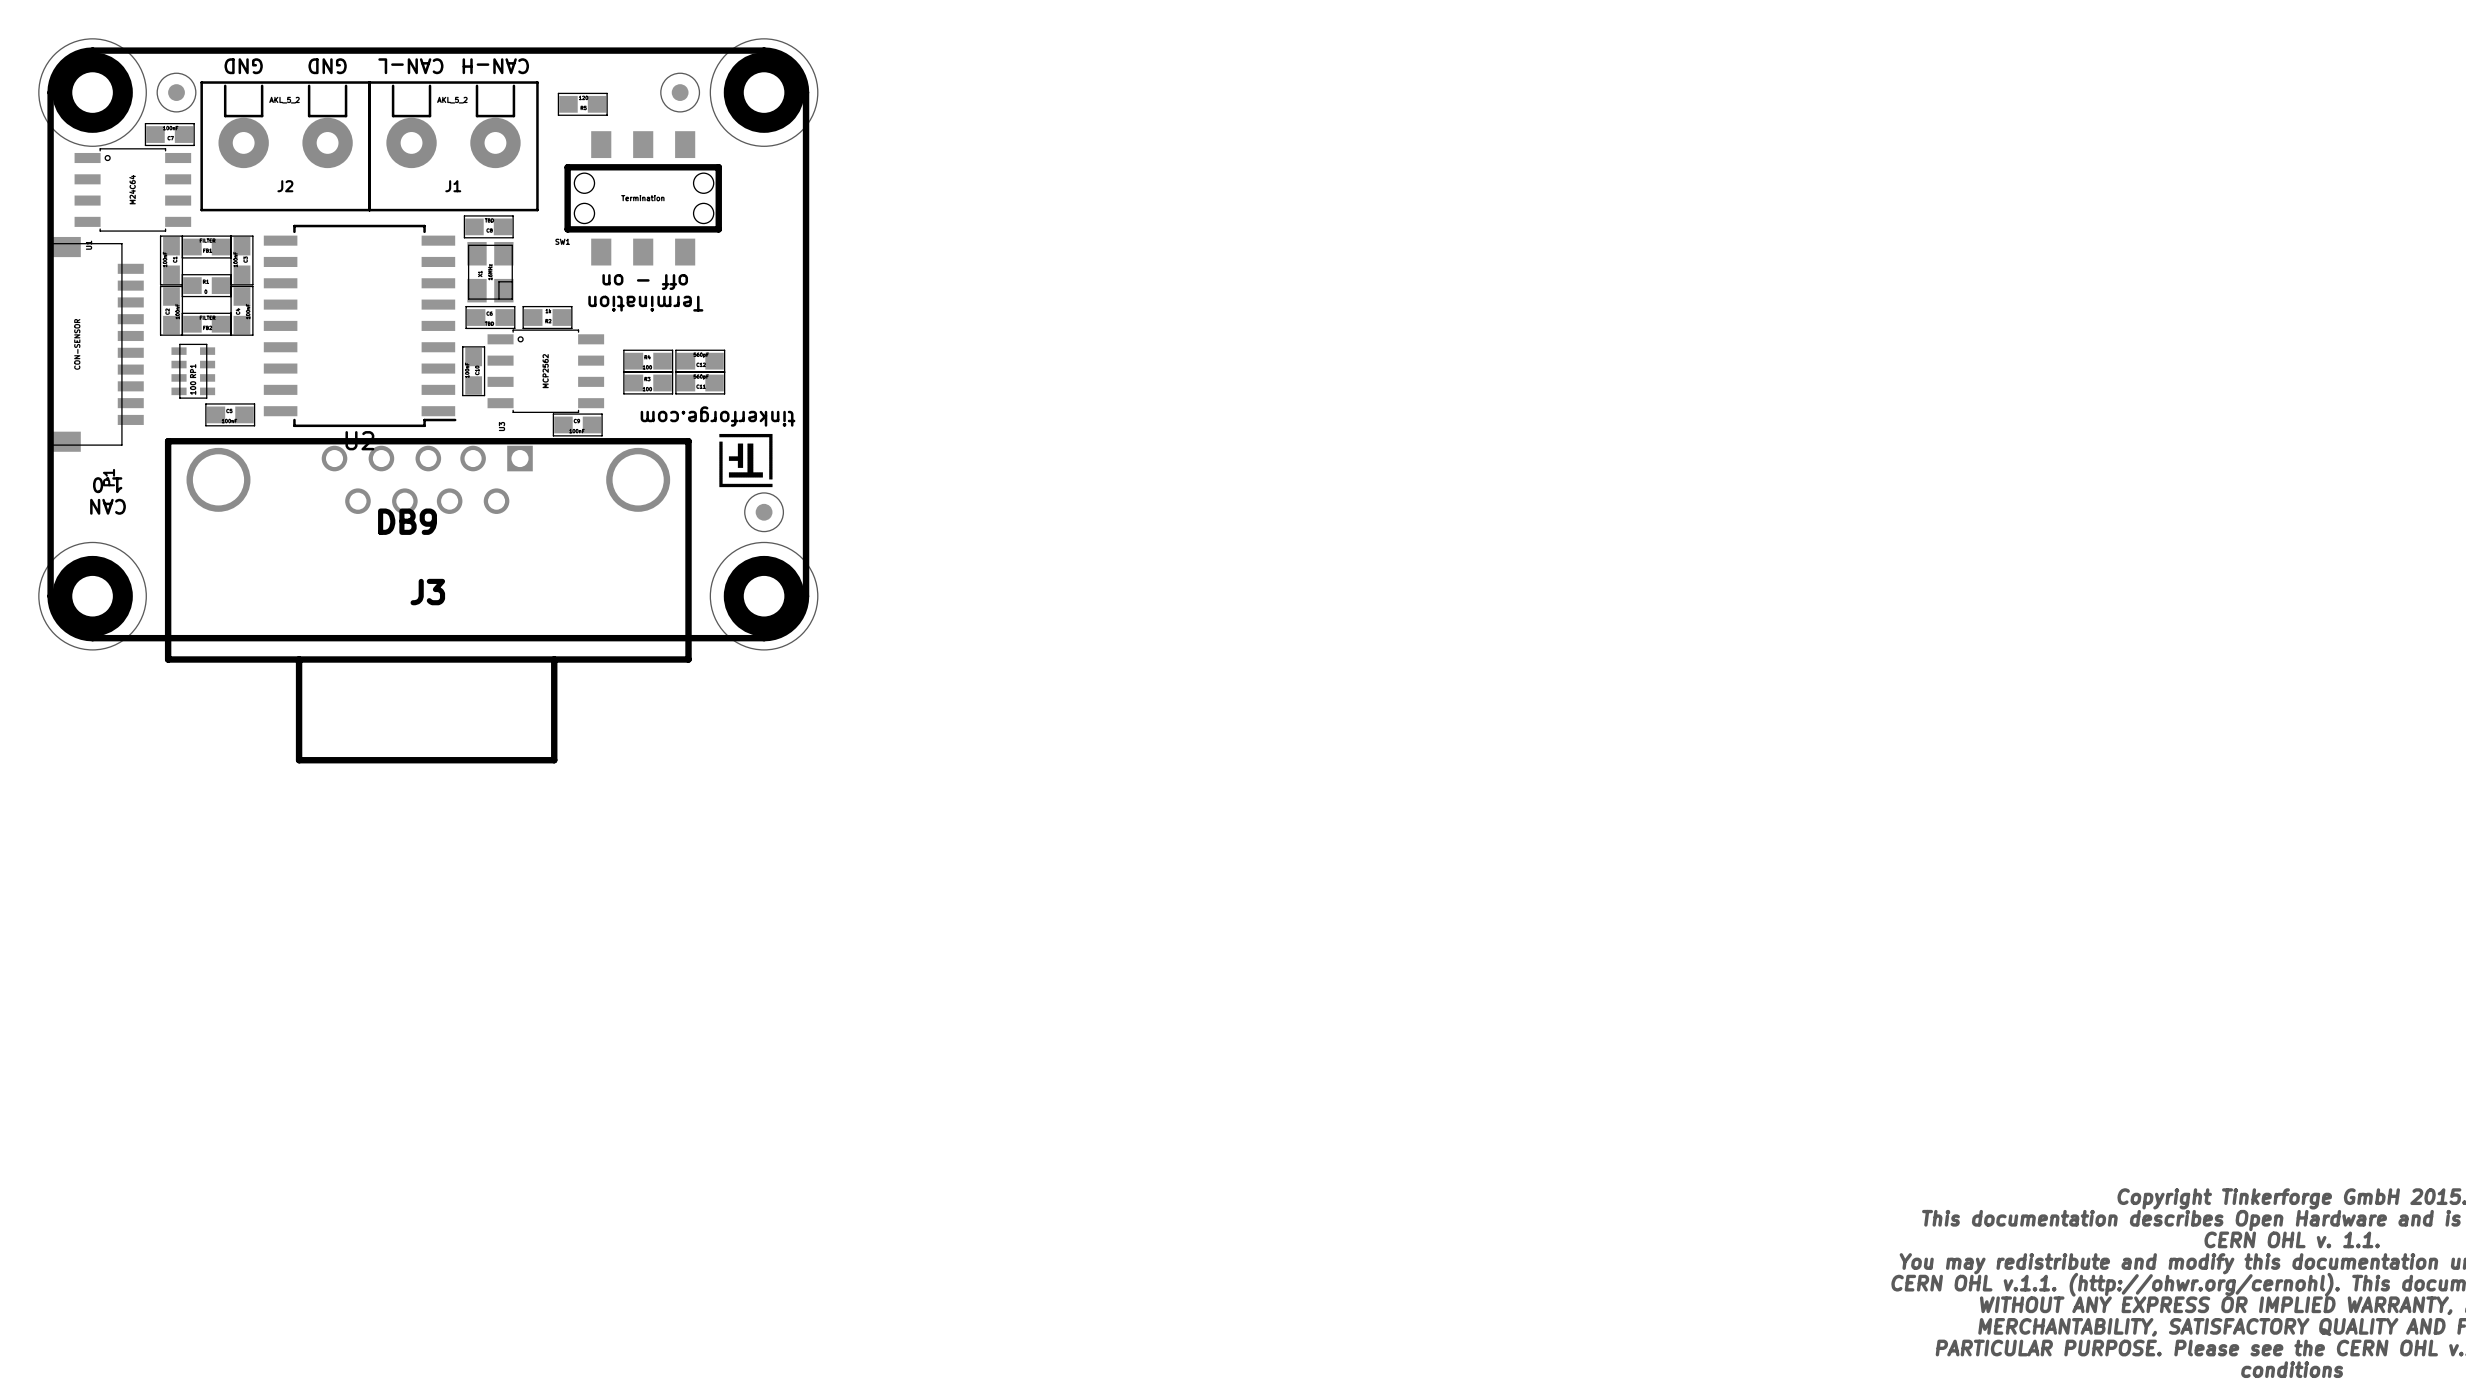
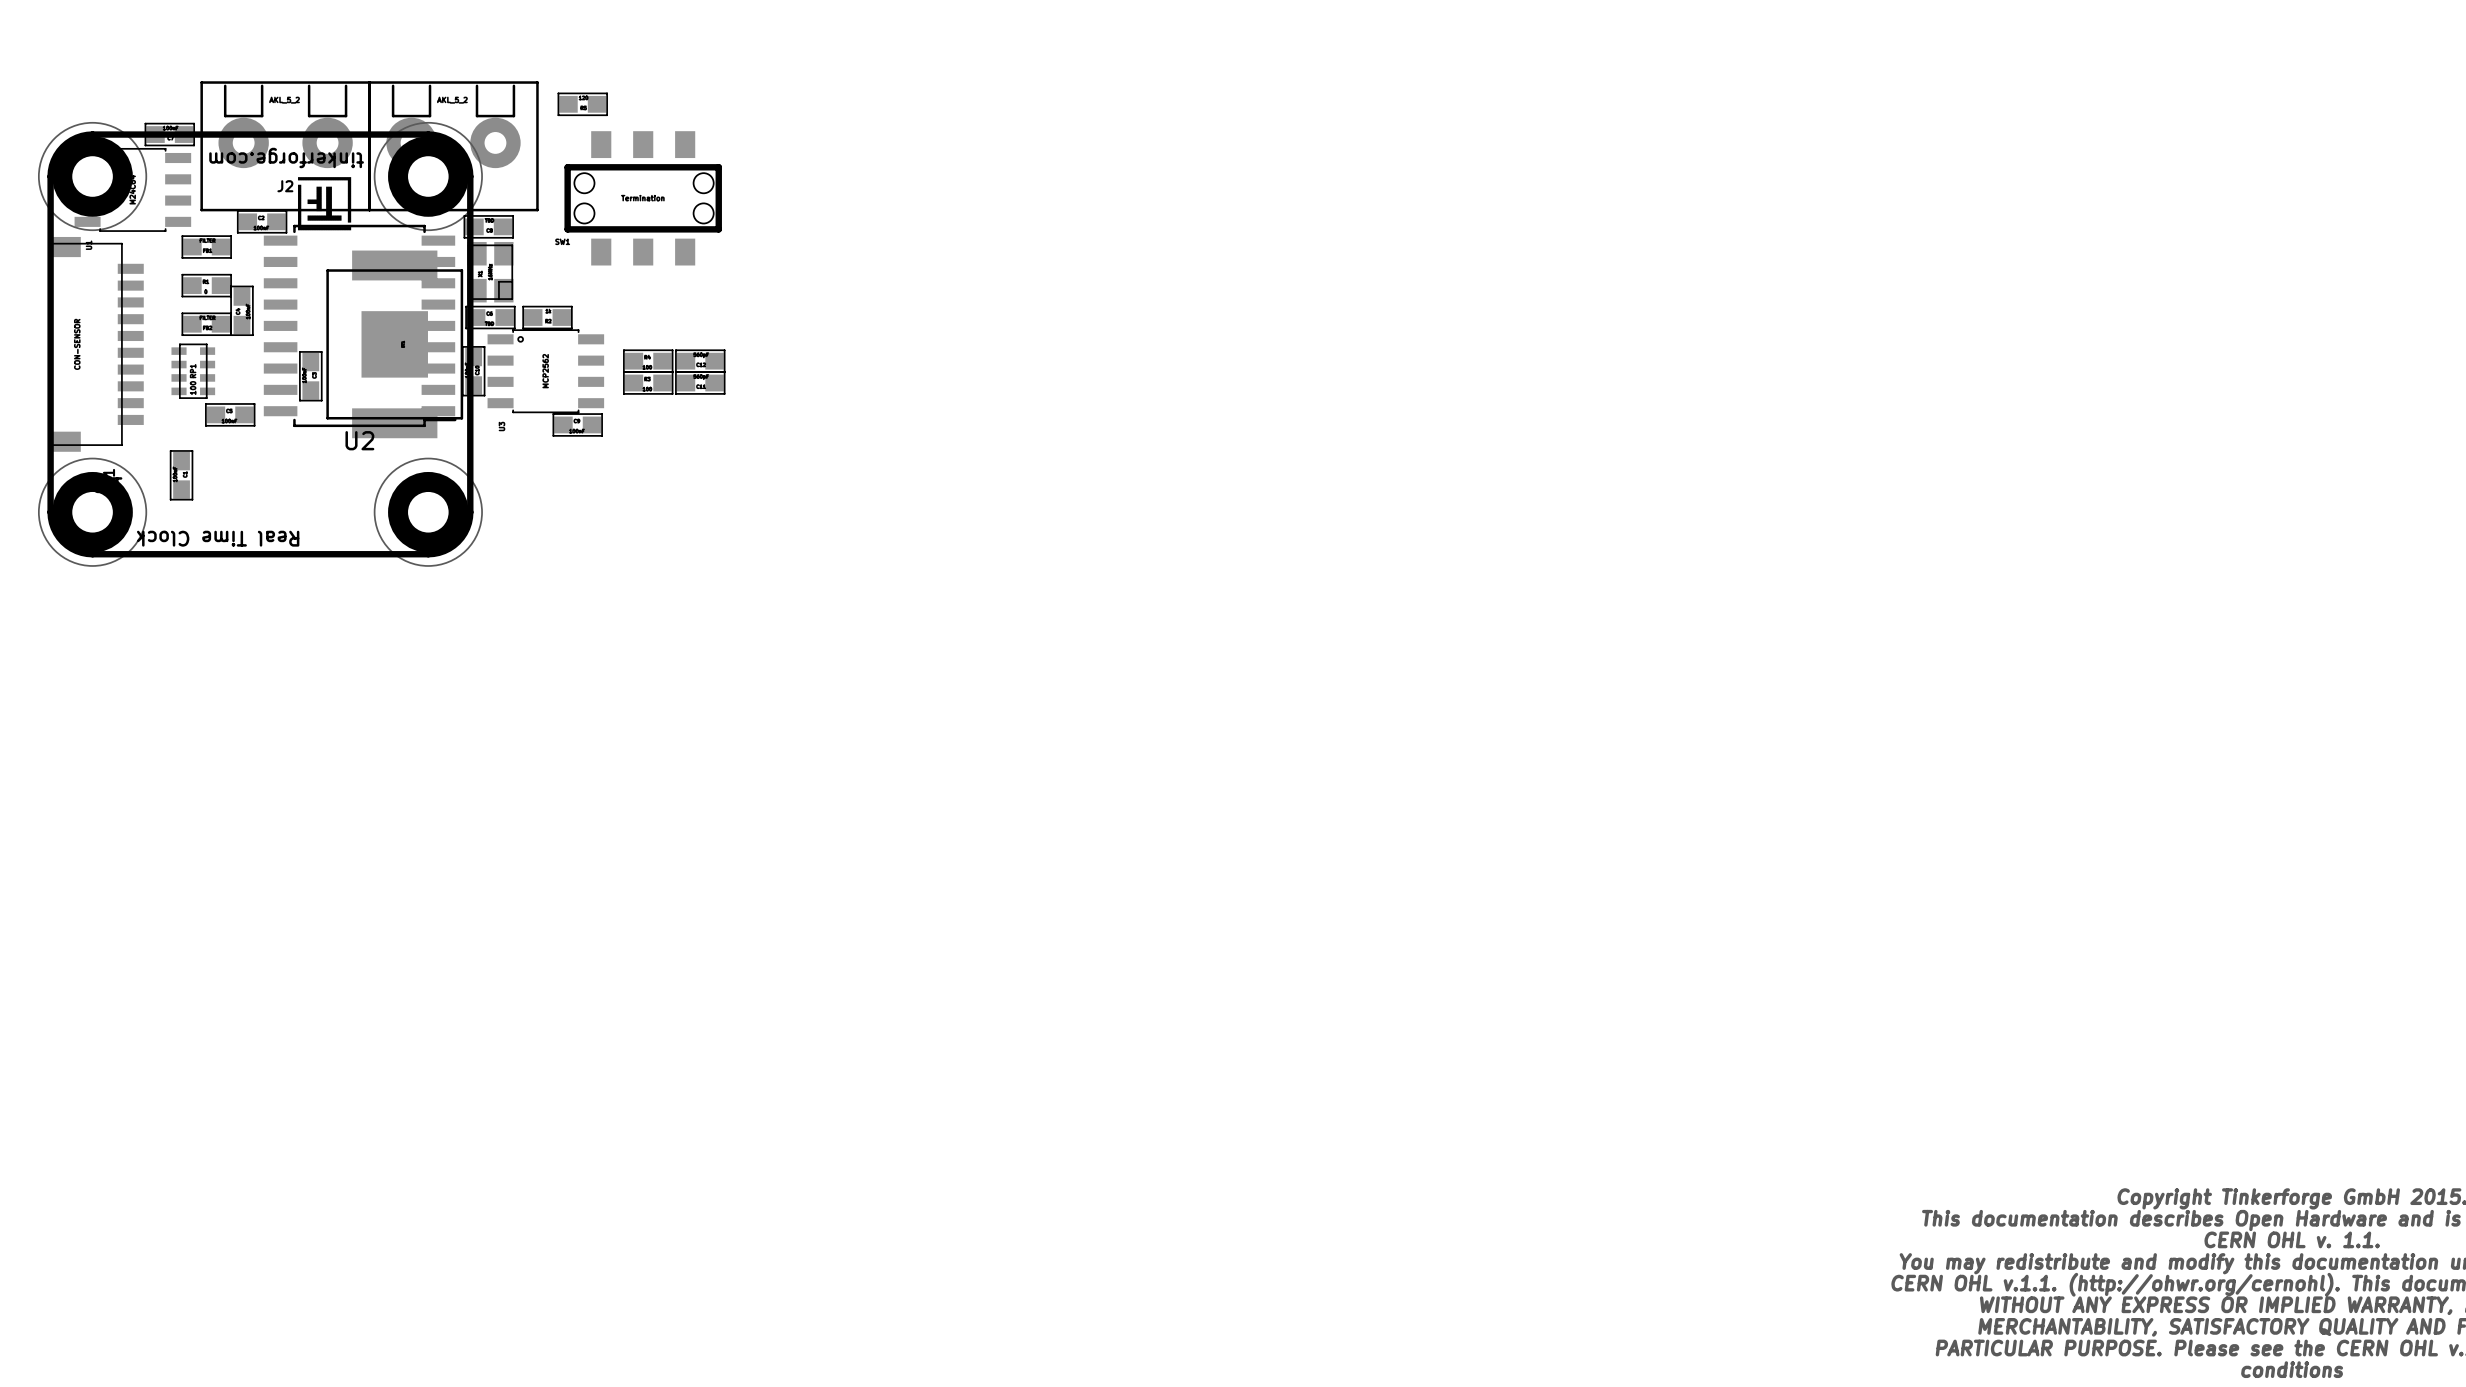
text: GND (243, 66) -> none
text: GND (327, 66) -> none
text: CAN-L (410, 66) -> none
text: CAN-H (495, 66) -> none
part position: (92, 92) -> (92, 176)
part: (176, 92) -> none
part: (680, 92) -> none
part: (764, 92) -> none
text: none -> tinkerforge.com (286, 157)
board edge: (50, 176) (52, 81) (59, 67) (67, 59) (87, 50) (764, 50) (780, 53) (789, 59) (800, 71) (805, 87) (806, 596) (800, 617) (785, 632) (764, 638) (87, 637) (67, 629) (59, 621) (52, 607) (50, 512) -> (50, 176) (53, 160) (62, 146) (76, 137) (92, 134) (433, 134) (449, 140) (461, 150) (468, 165) (470, 176) (470, 512) (464, 533) (453, 545) (444, 551) (428, 554) (87, 553) (71, 548) (59, 537) (52, 523) (50, 512)
part: none -> (428, 176)
drawing: none -> [297, 177, 352, 231]
part position: (171, 260) -> (181, 475)
part position: (241, 260) -> (310, 376)
text: off - on (645, 282) -> none
text: Termination (645, 303) -> none
part rotation: 0° (171, 310) -> 90° clockwise (262, 221)
part position: (171, 310) -> (262, 221)
part: none -> (394, 344)
text: tinkerforge.com (718, 416) -> none
drawing: [719, 433, 773, 488] -> none
text: CAN (108, 506) -> none
part: none -> (428, 512)
part: (764, 512) -> none
text: none -> Real Time Clock (218, 538)
part position: (92, 596) -> (92, 512)
part: (764, 596) -> none
J3: DB9 (428, 600) -> none

